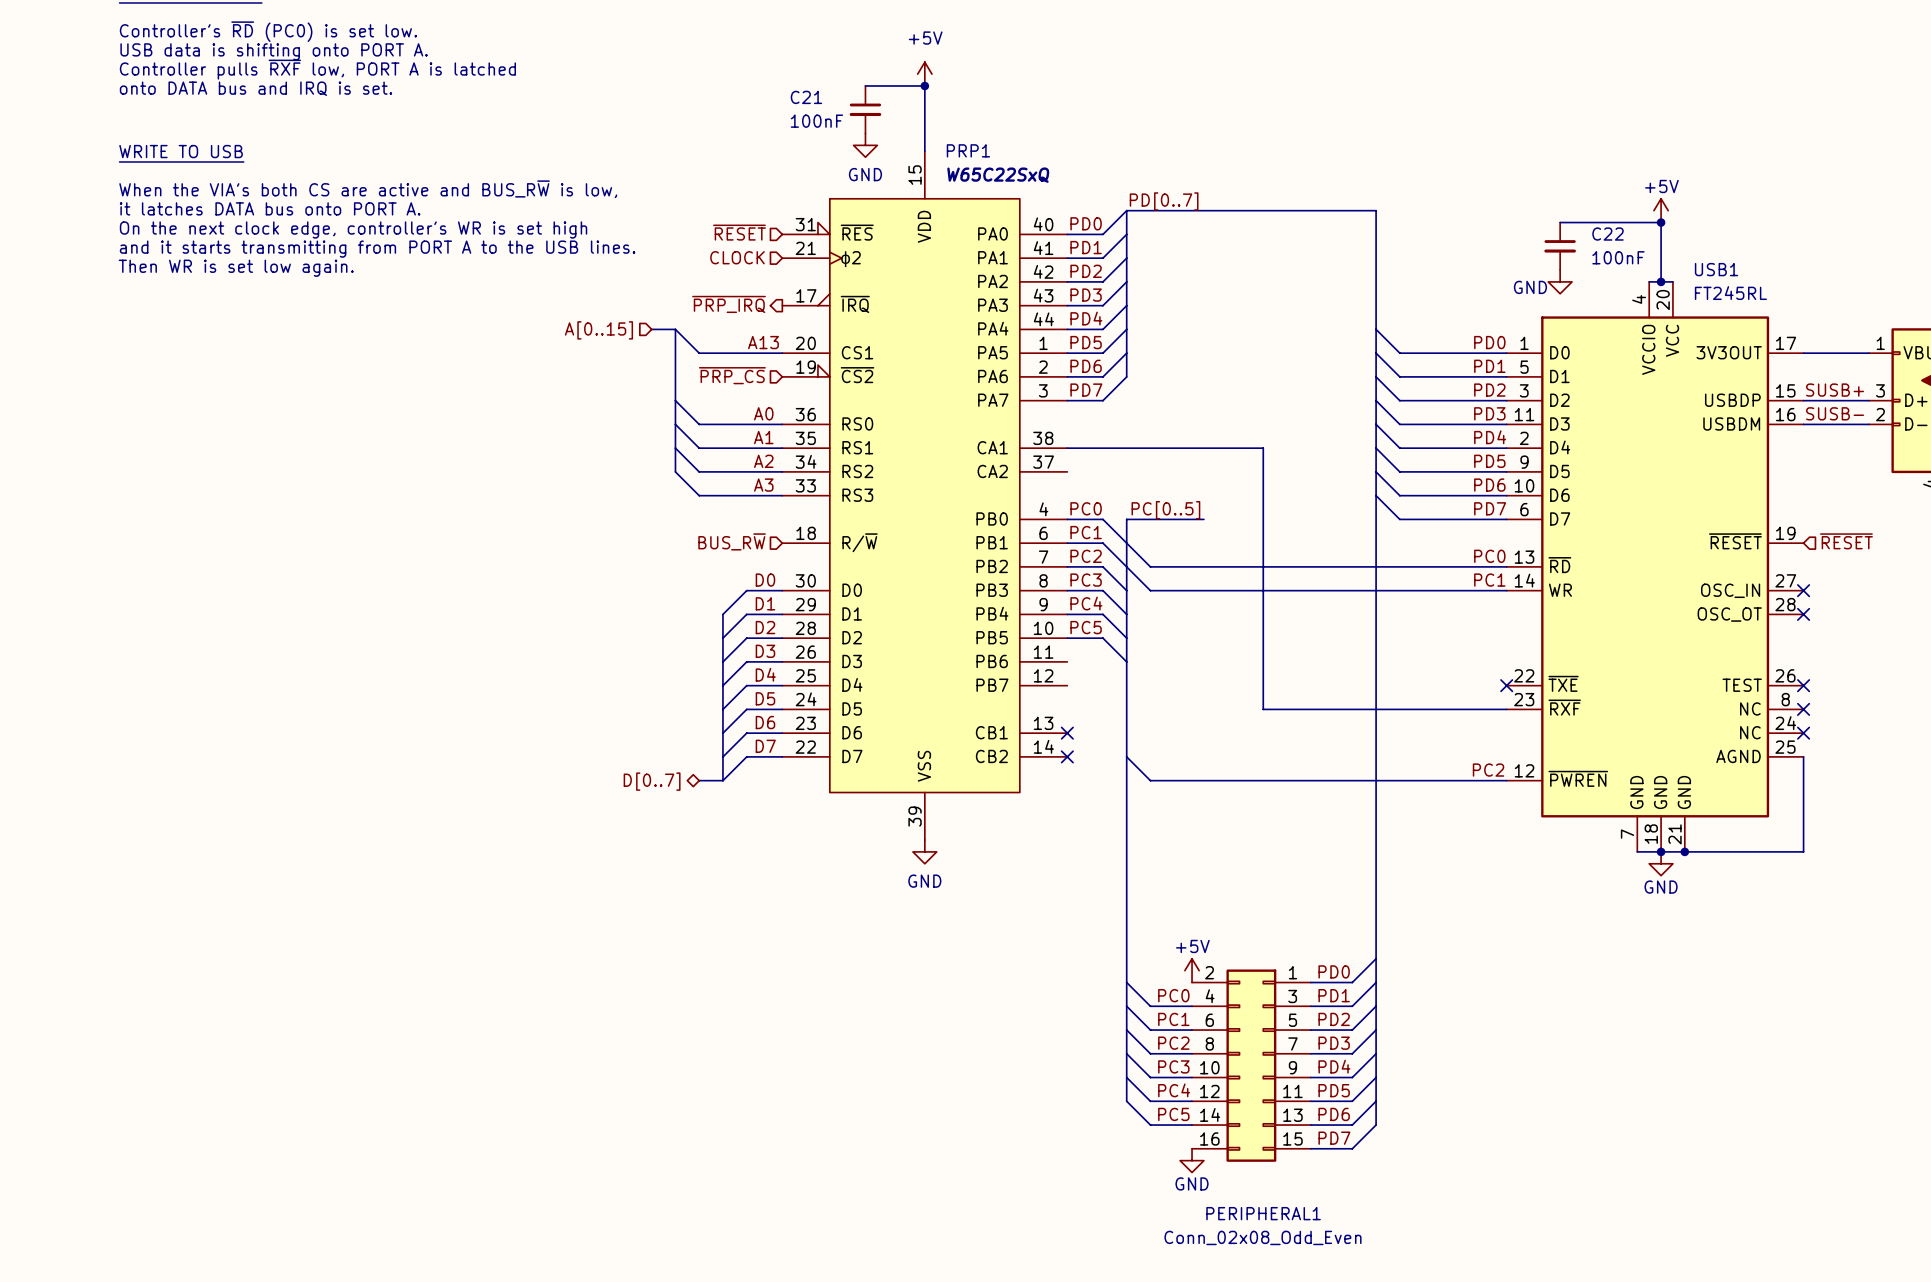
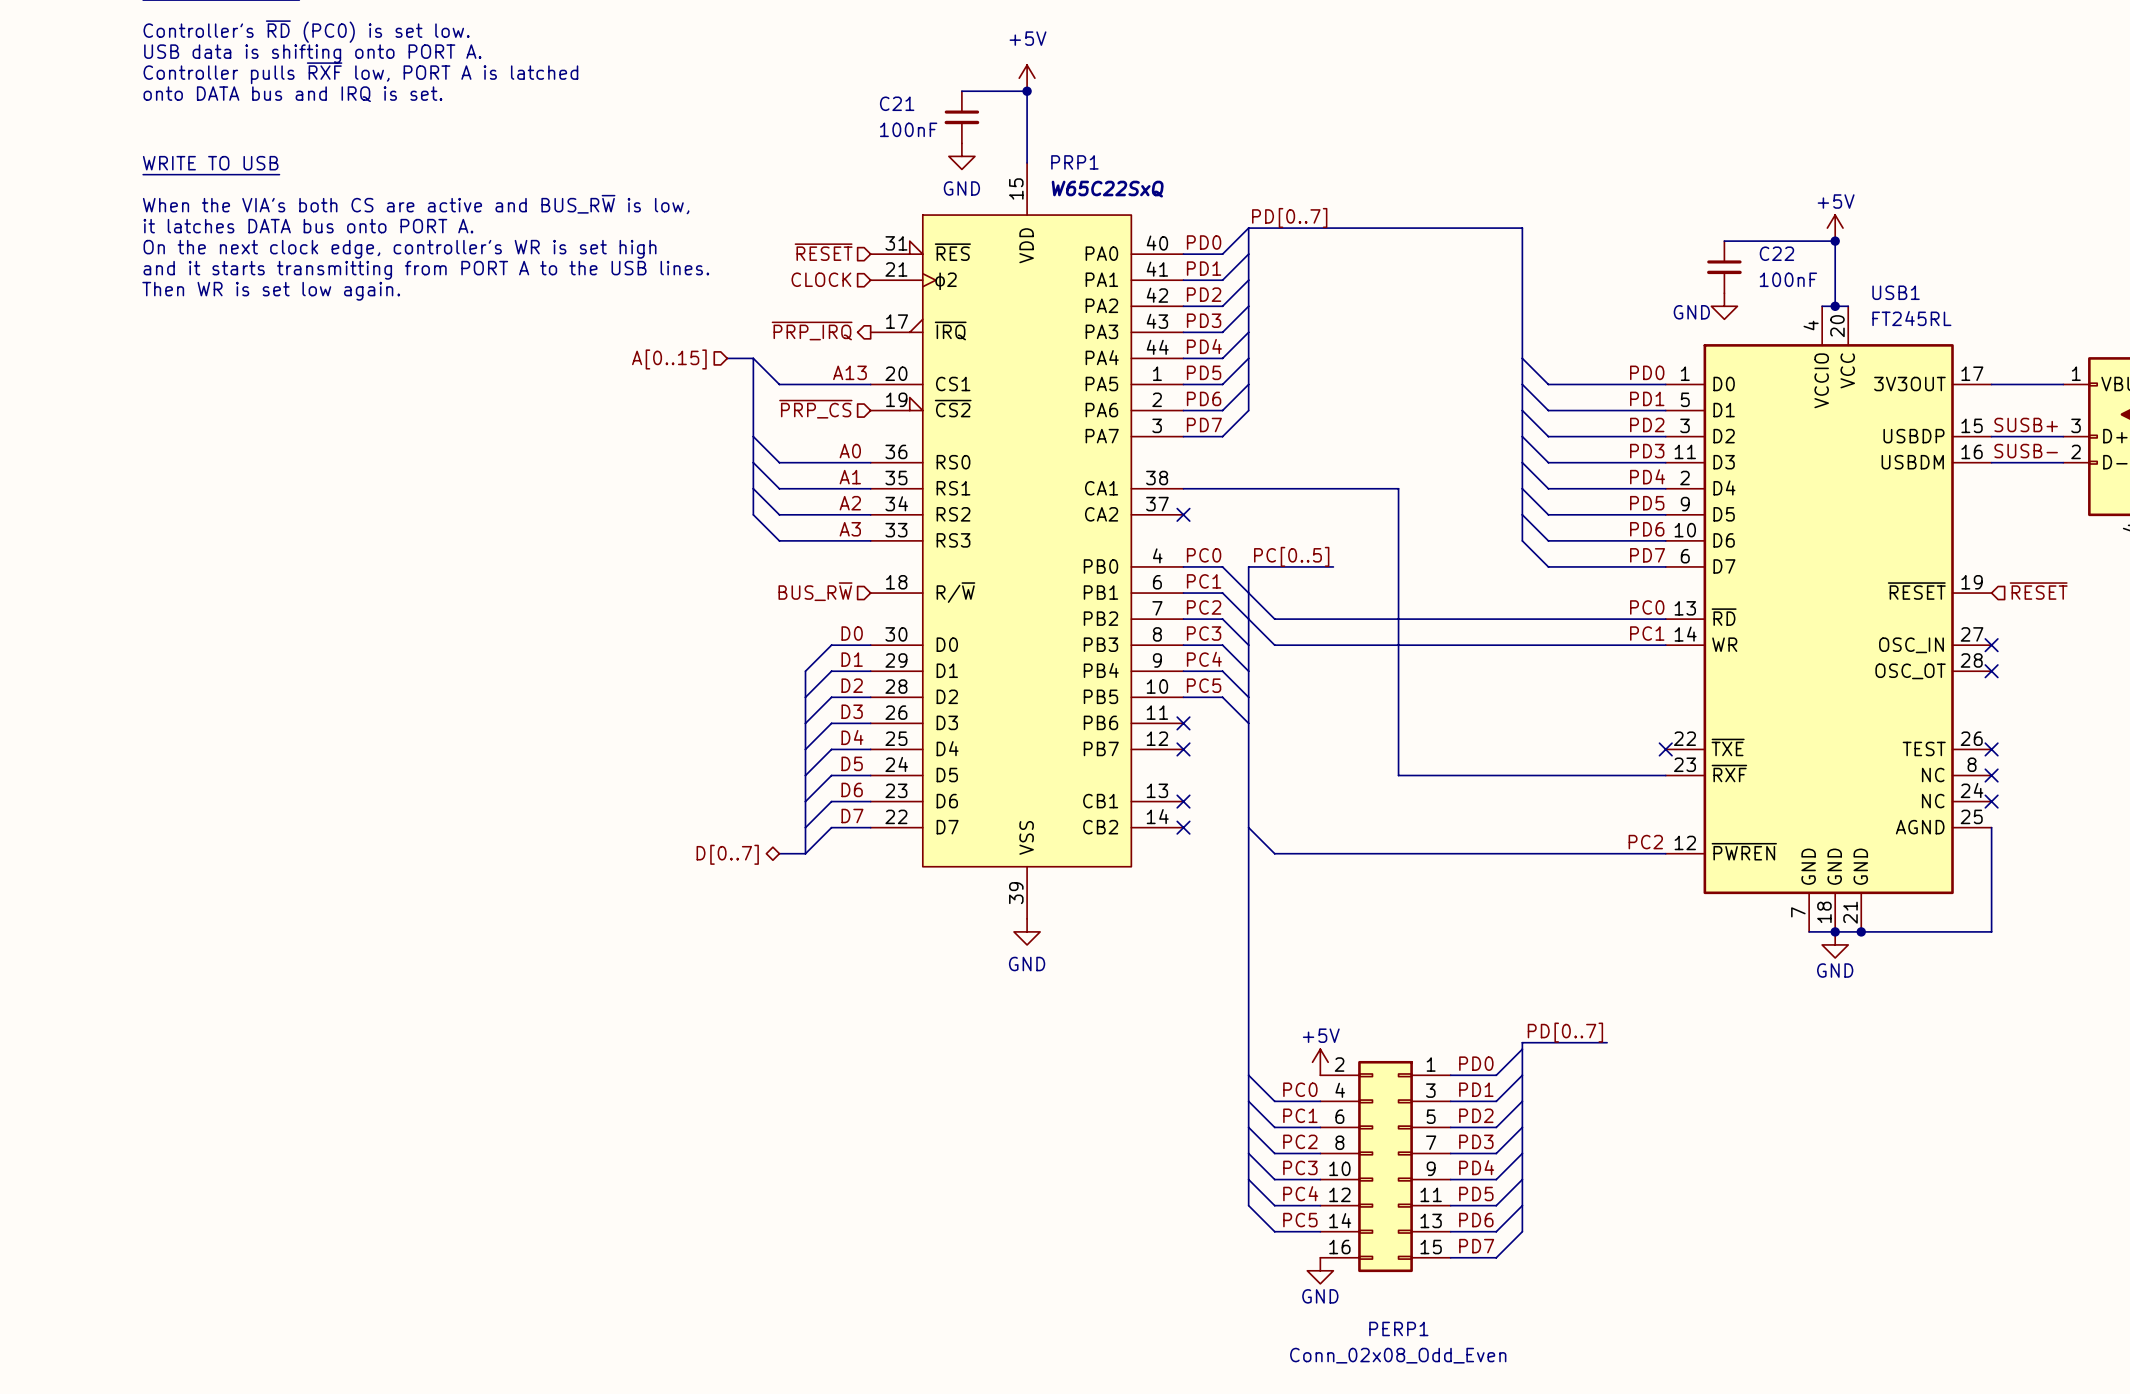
no-connect mark: none -> (1183, 514)
bus: (1376, 495) (1376, 952) -> (1607, 1042) (1522, 1042)
no-connect mark: none -> (1183, 723)
no-connect mark: none -> (1183, 749)
label: none -> PD[0..7] (1565, 1032)
PERIPHERAL1 name: PERIPHERAL1 (1263, 1213) -> PERP1 (1398, 1328)

